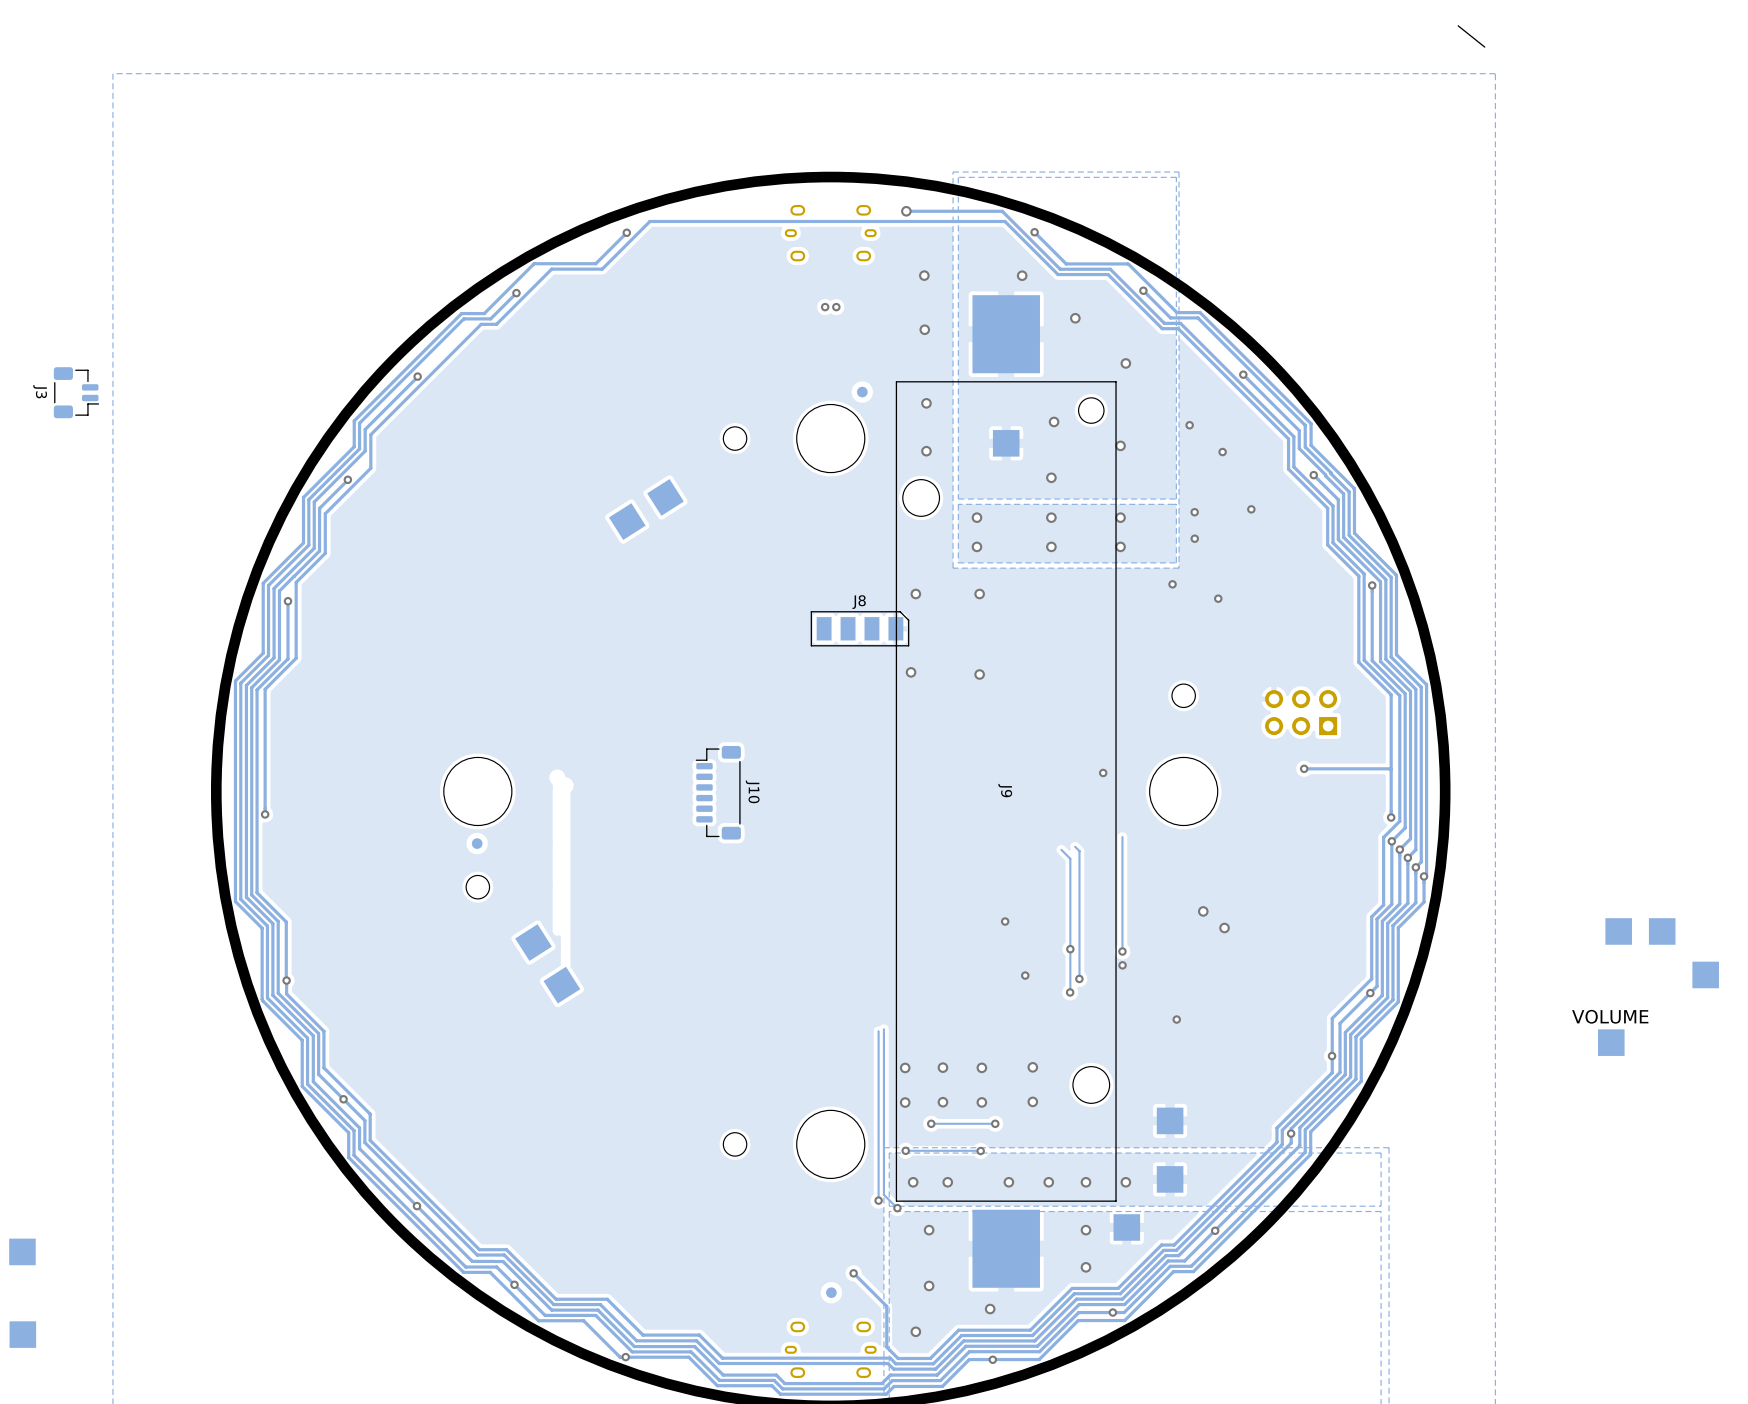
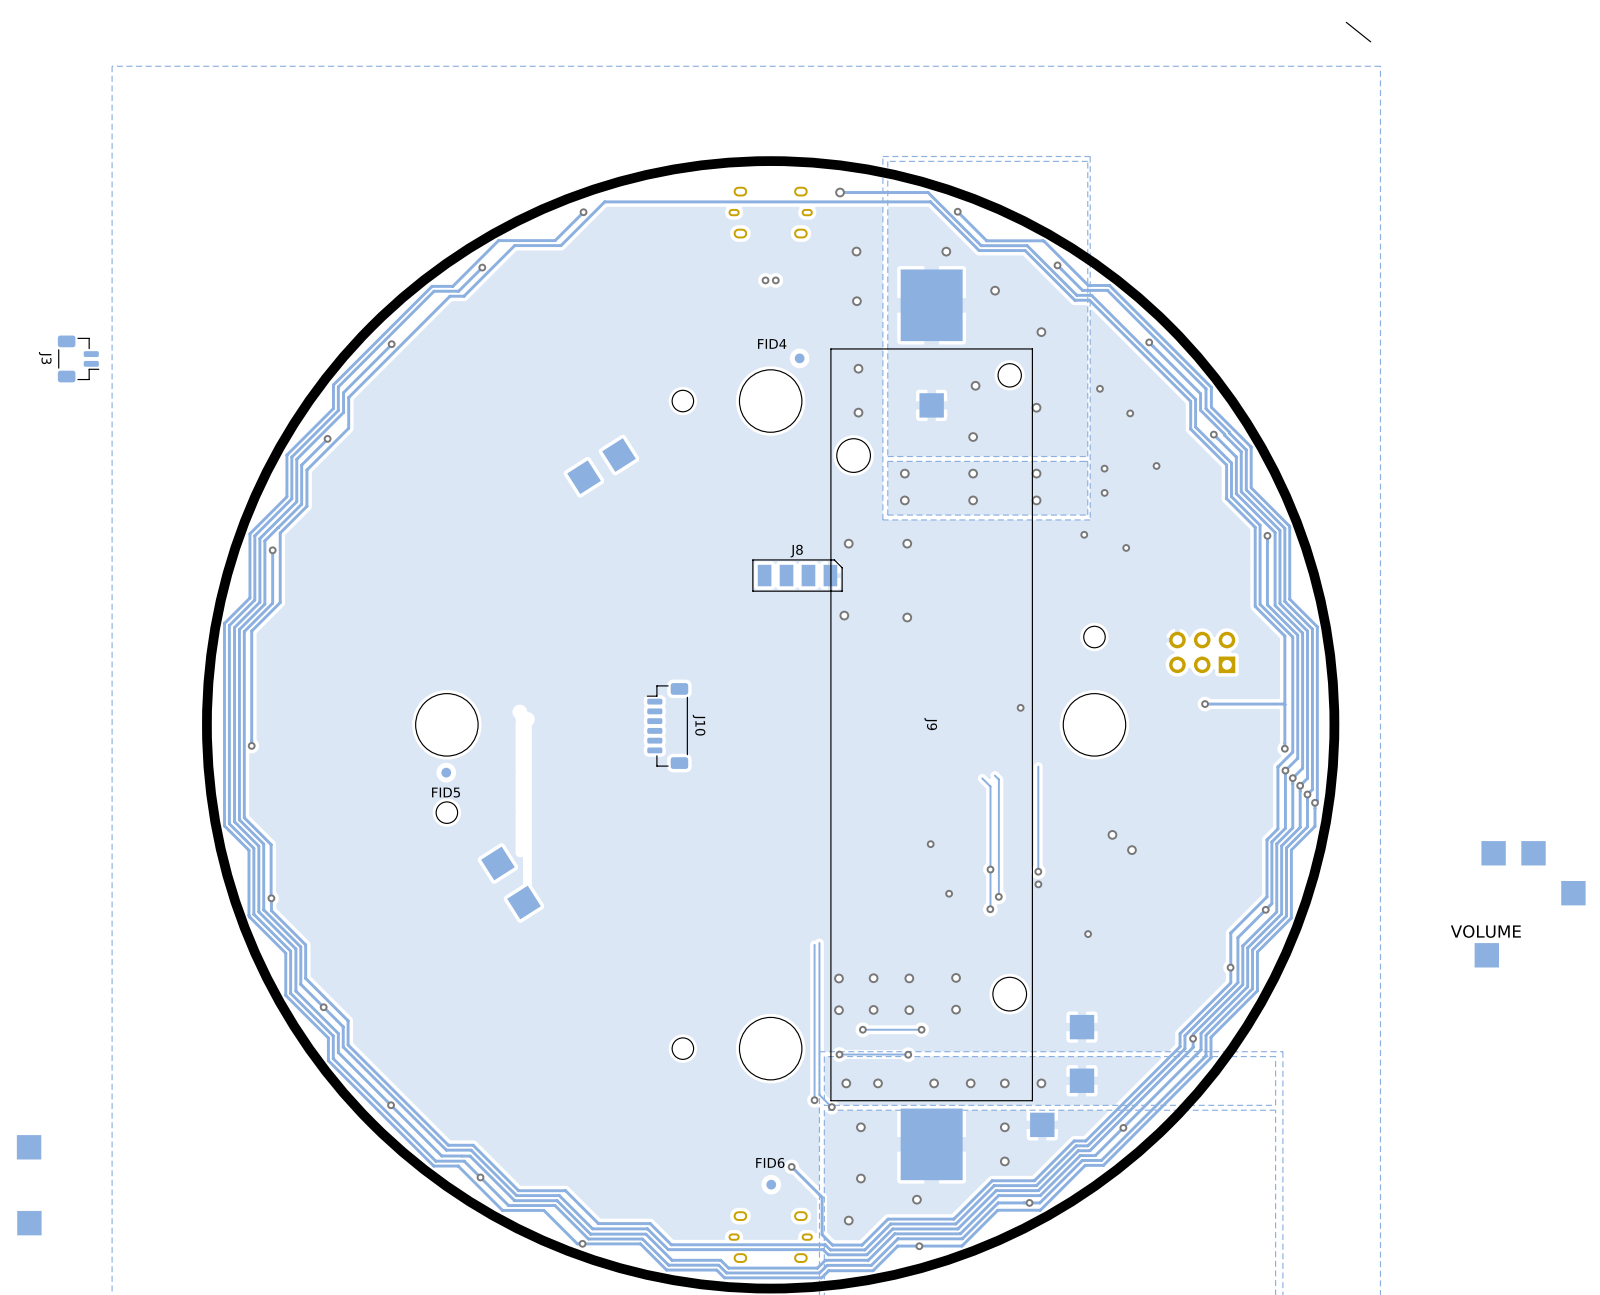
FID4 name: none -> FID4 (772, 343)
FID5 name: none -> FID5 (446, 792)
FID6 name: none -> FID6 (770, 1162)

